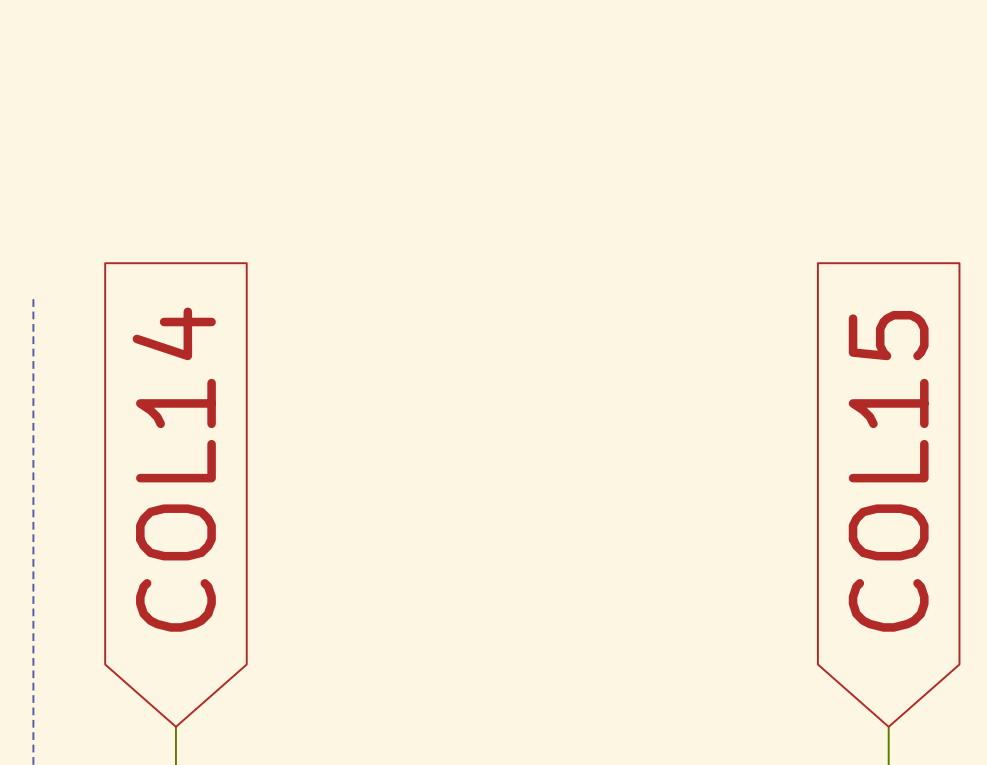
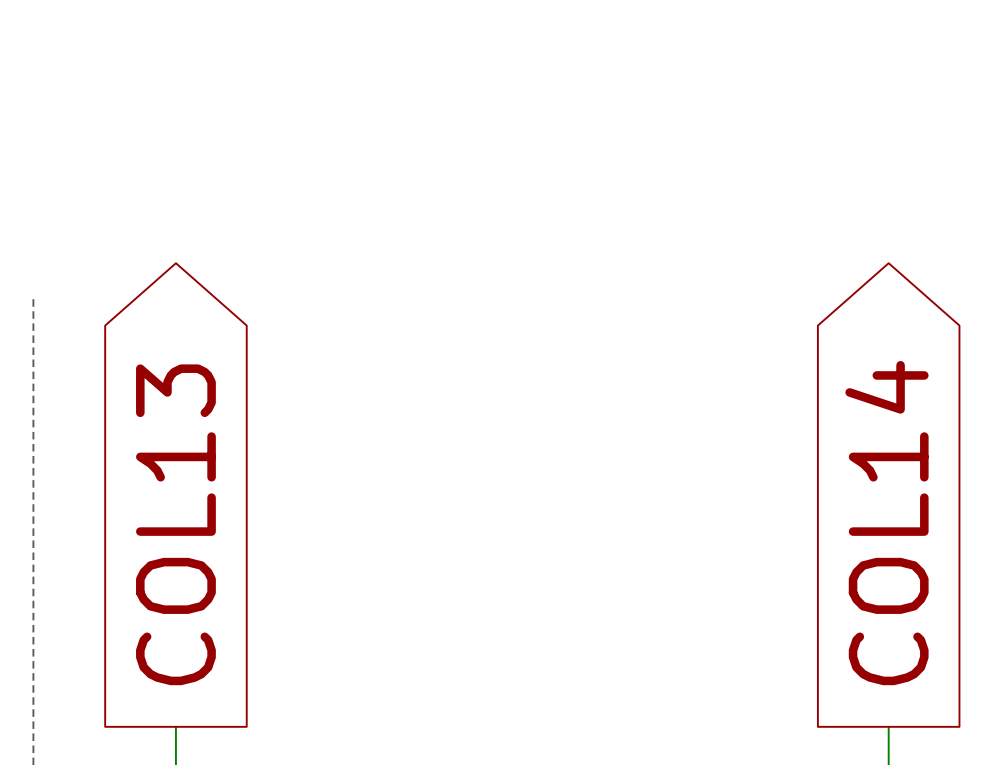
global label shape: input (174, 469) -> output (175, 524)
global label: COL14 (174, 469) -> COL13 (175, 524)
global label shape: input (888, 471) -> output (886, 523)
global label: COL15 (888, 471) -> COL14 (886, 523)

